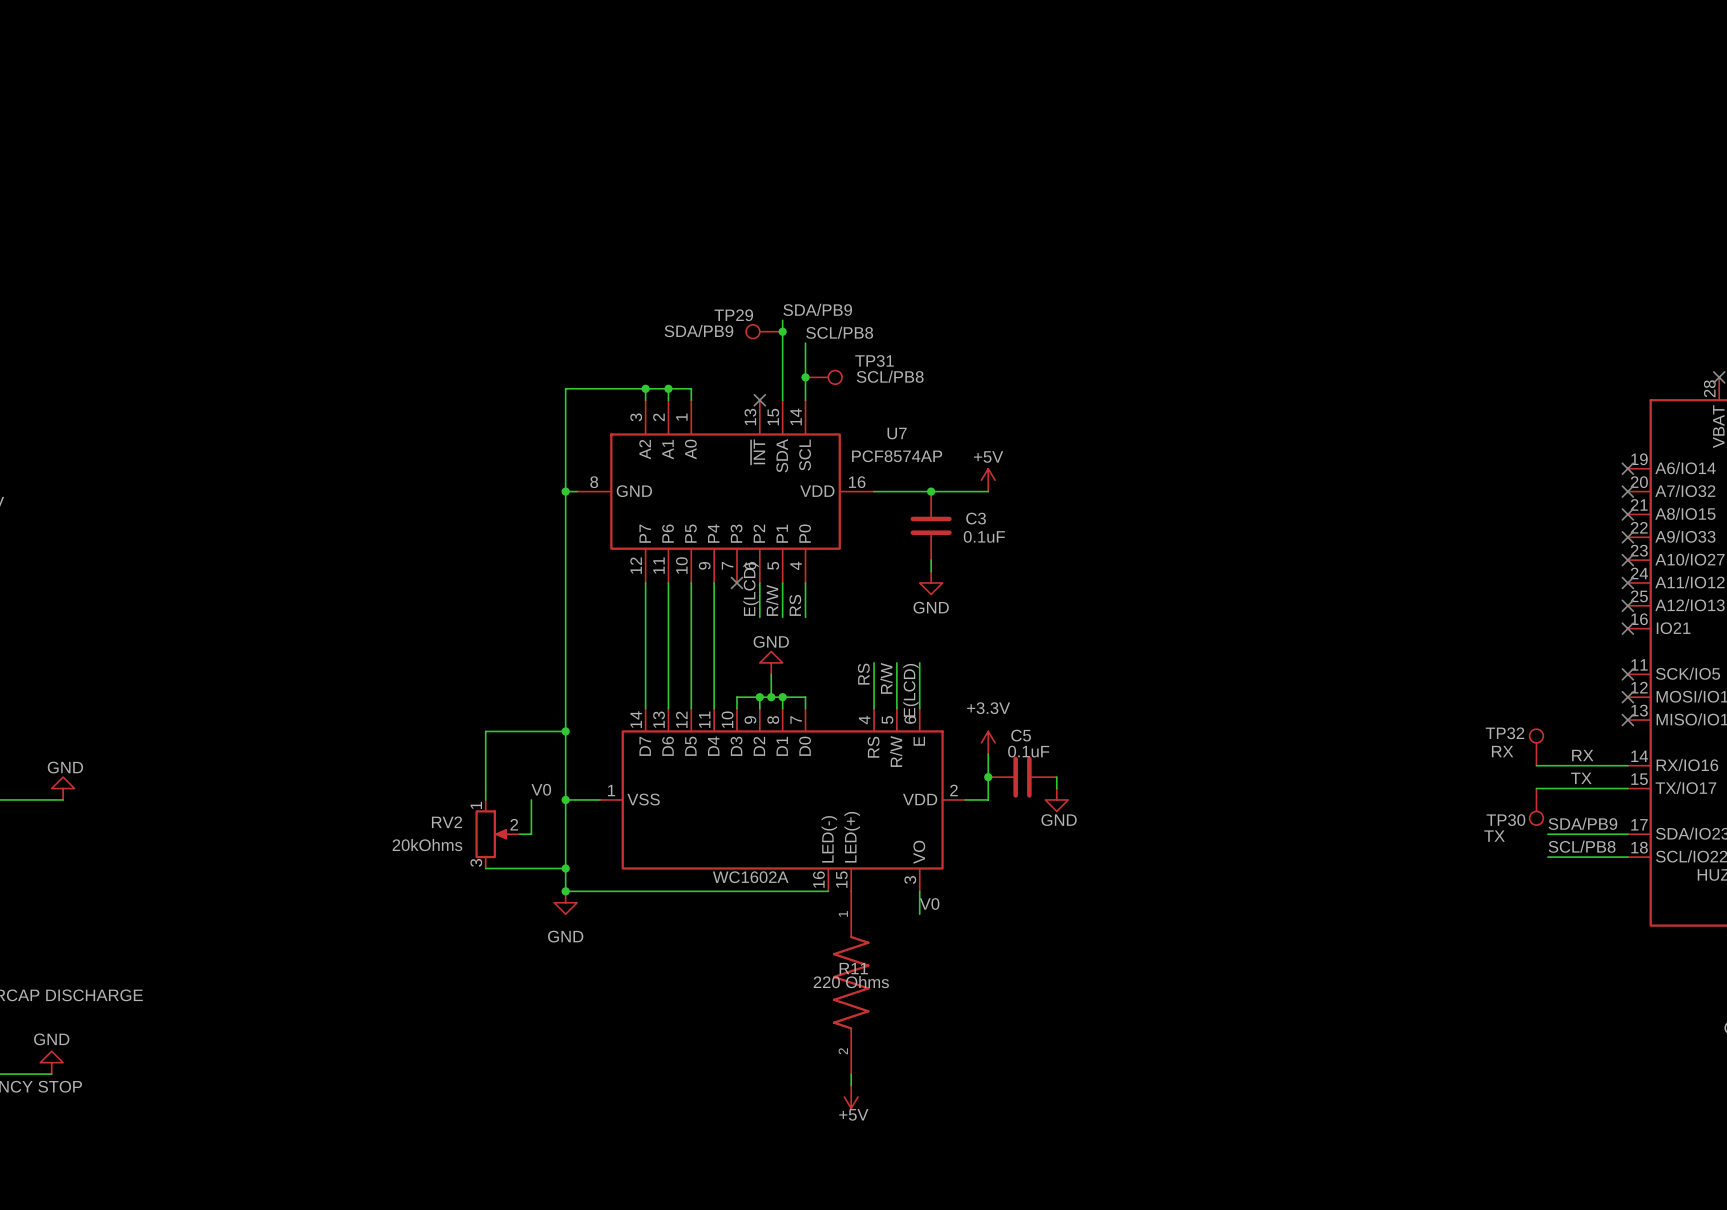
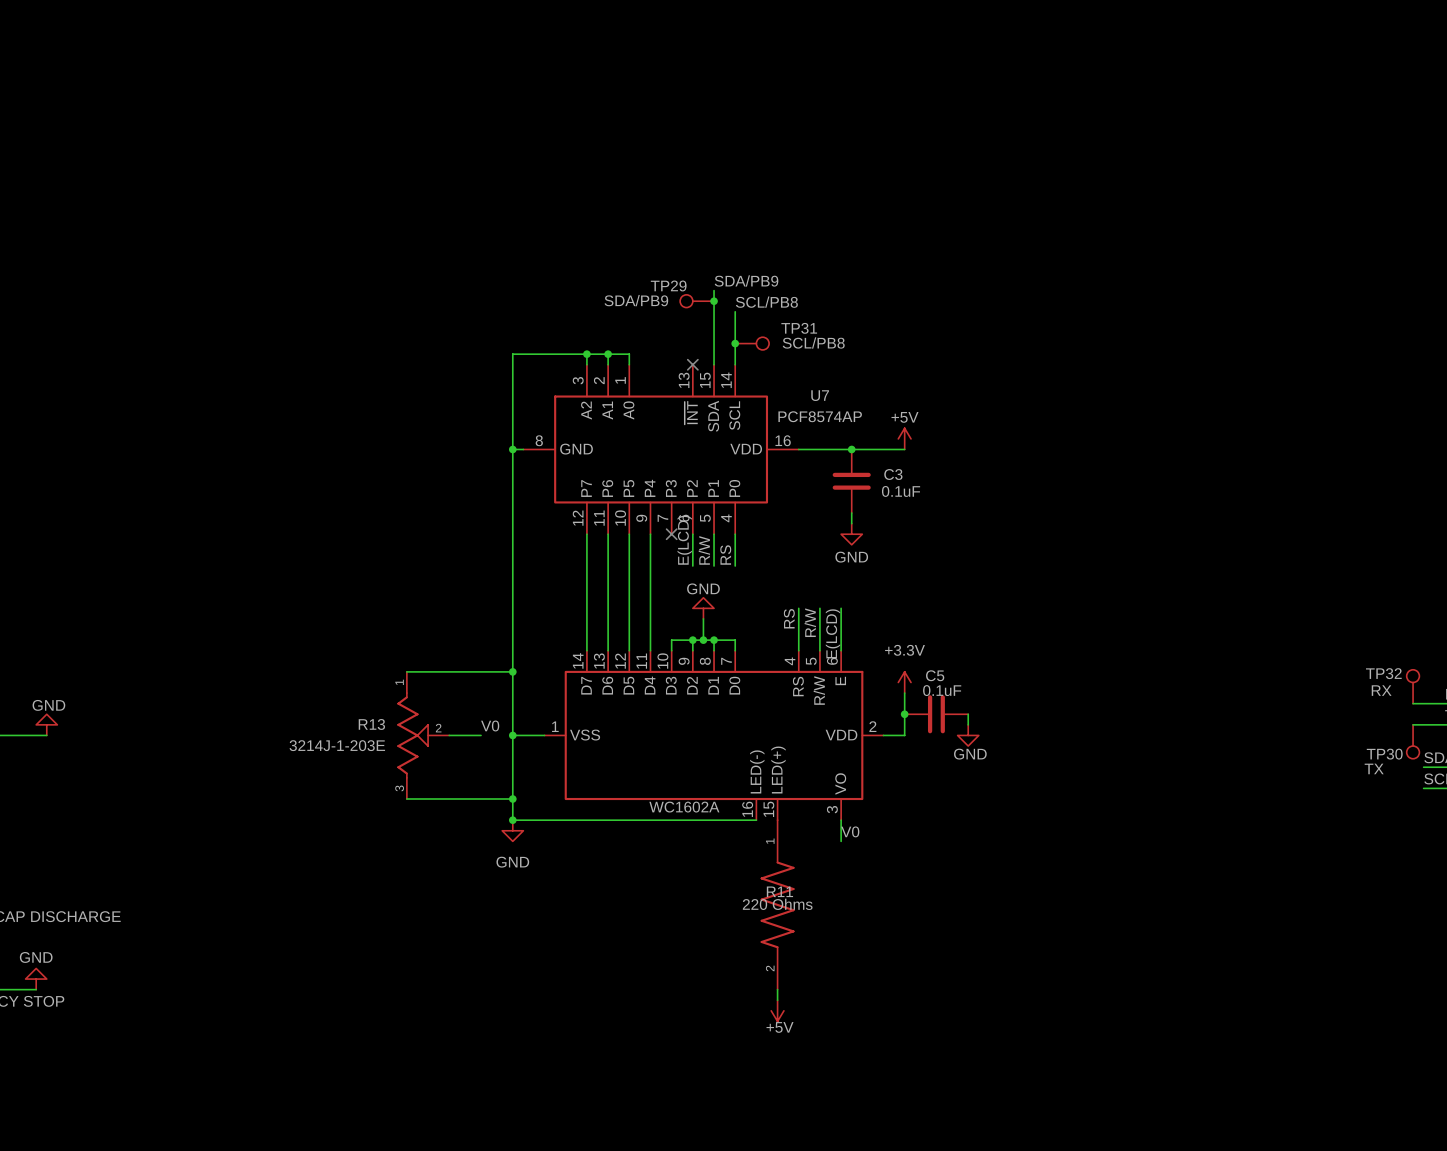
wire: (485, 731) (485, 799) -> (438, 671) (406, 671)
R13: none -> 3214J-1-203E (423, 735)
wire: (531, 799) (531, 834) (519, 834) -> (481, 735) (449, 735)
RV2: 20kOhms (497, 834) -> none
wire: none -> (406, 799) (438, 799)

